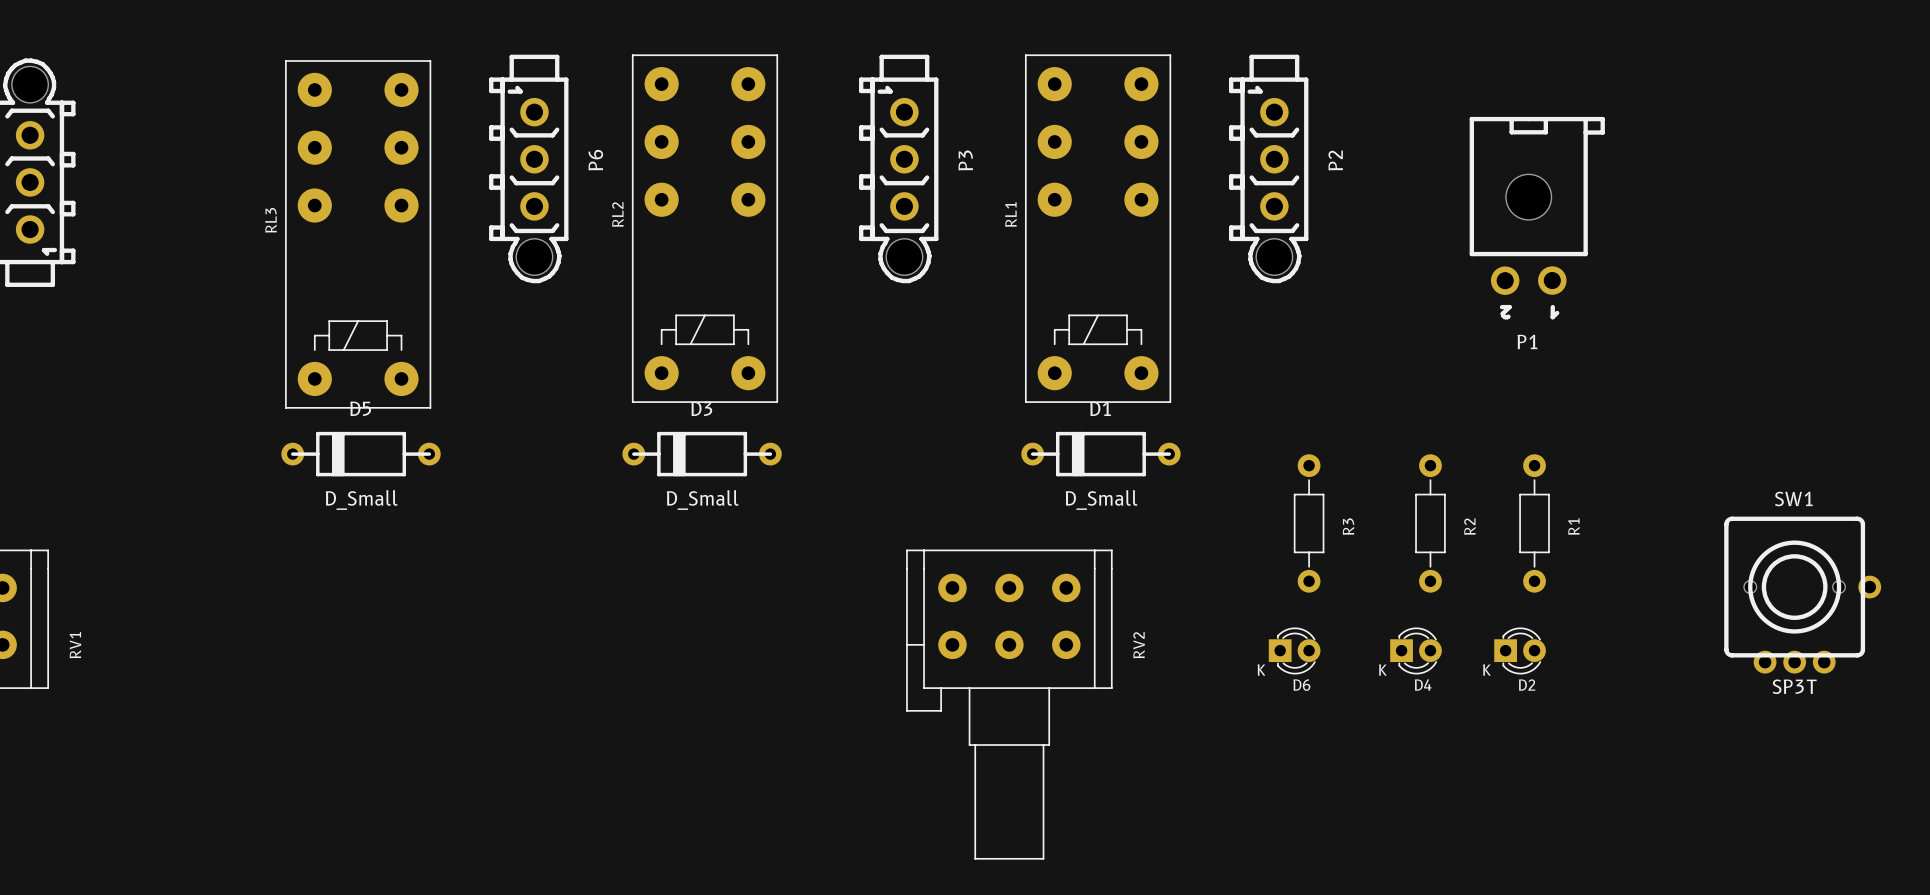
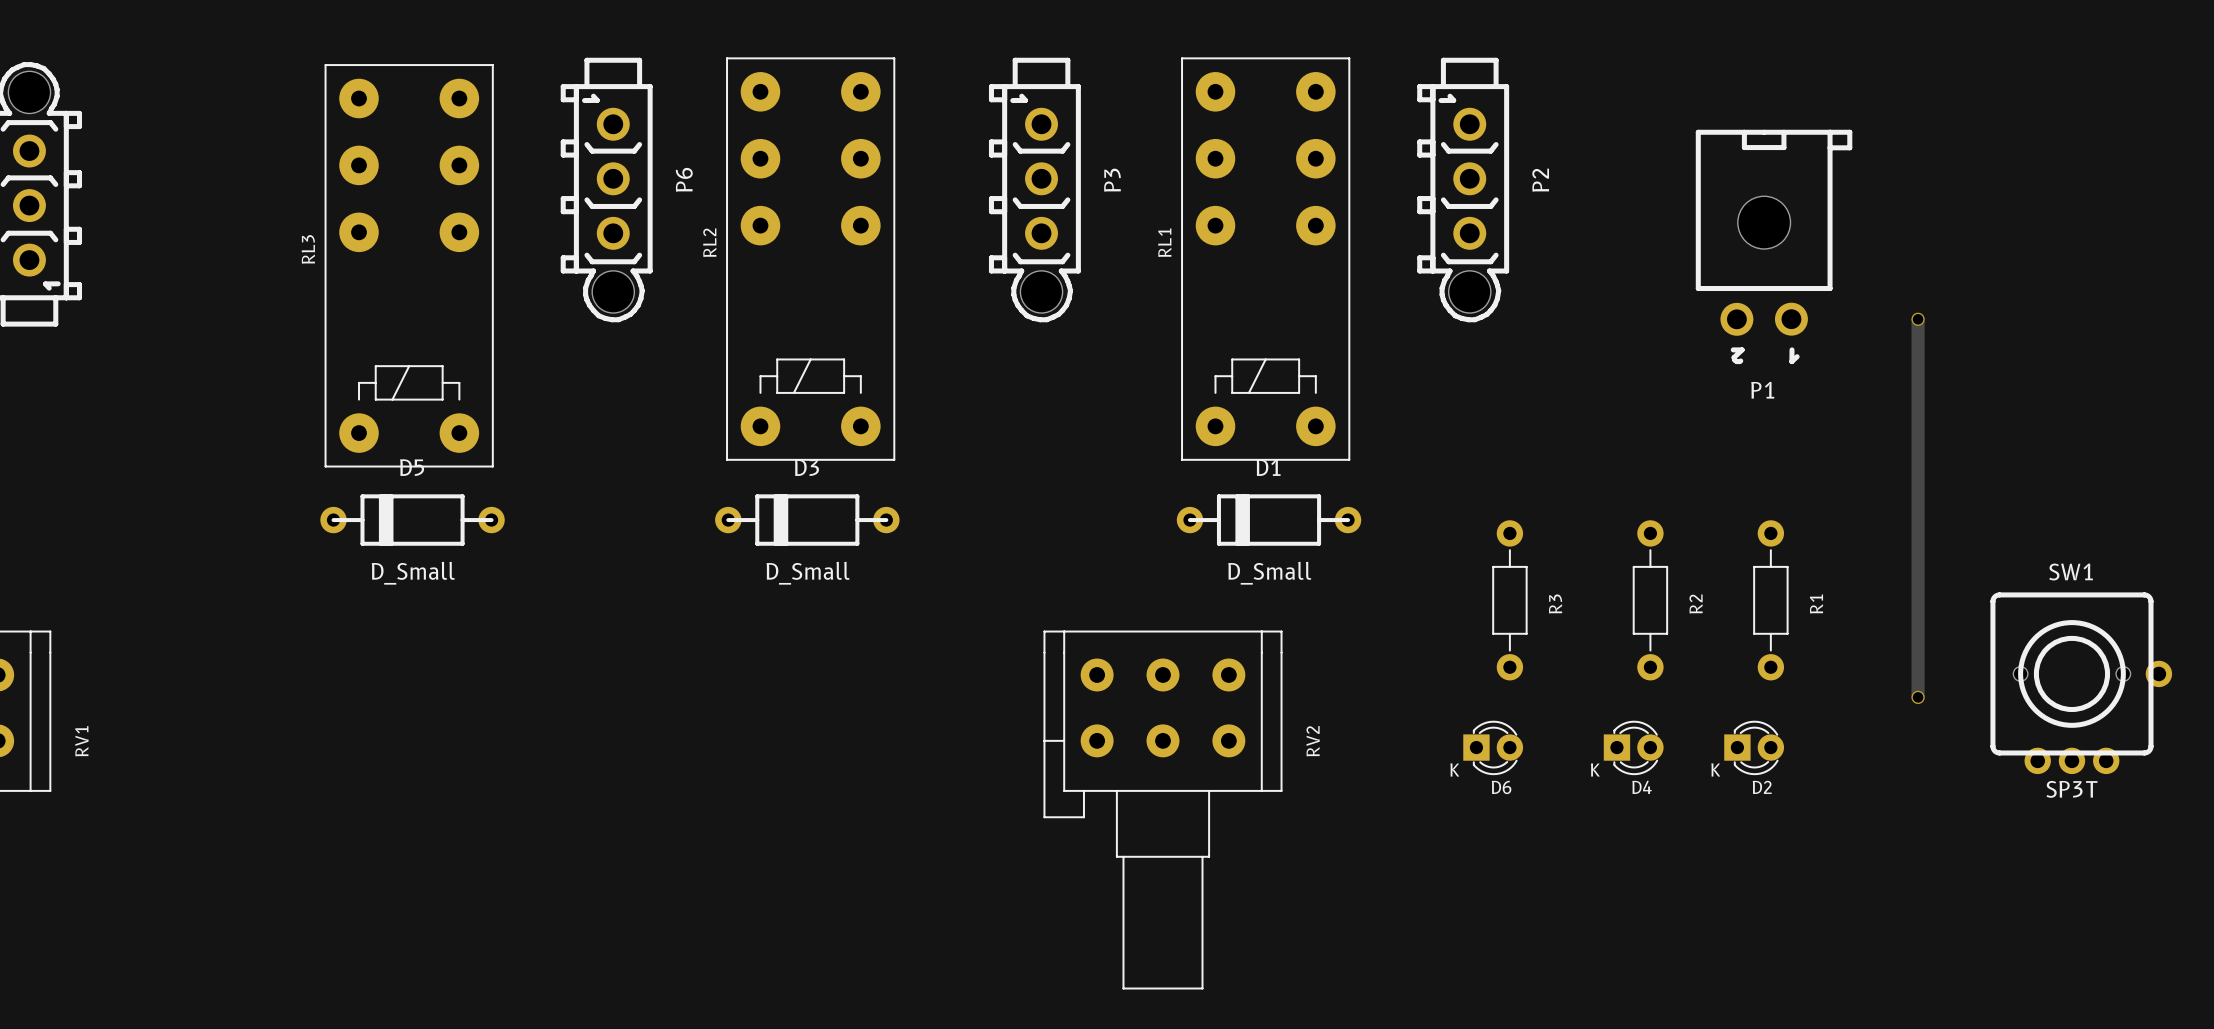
track: none -> (1918, 319) (1918, 697)
via: none -> (1918, 319)
via: none -> (1918, 697)

